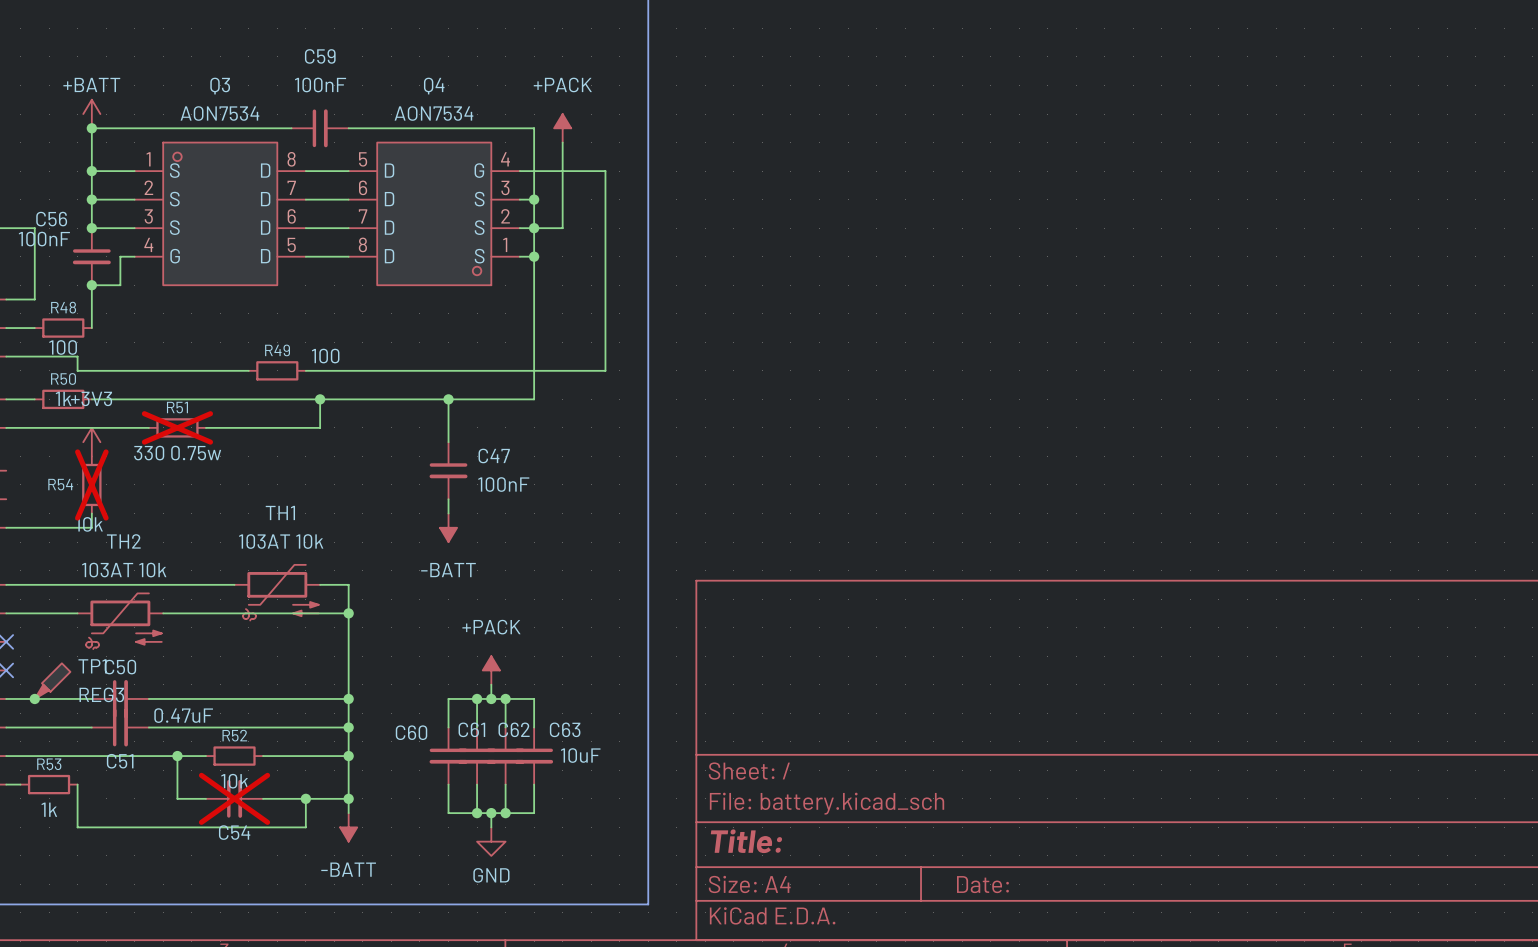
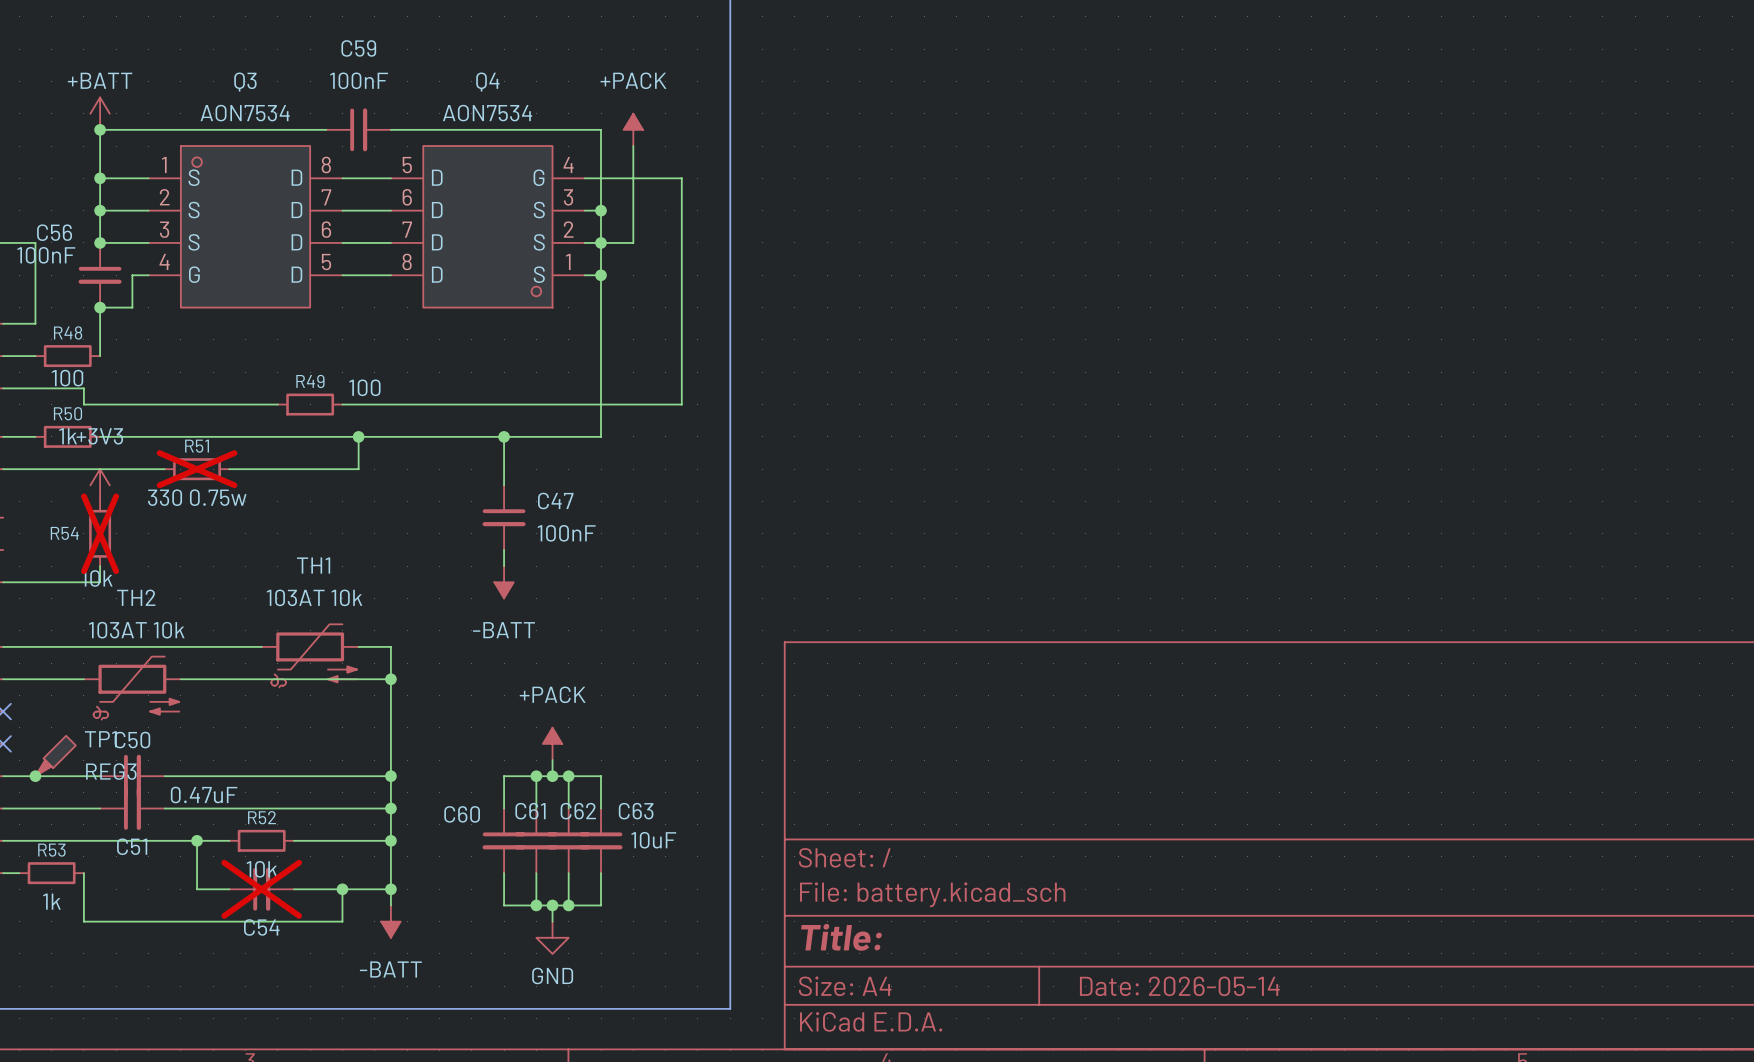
title block: Date: (982, 884) -> Date: 2026-05-14 (1179, 986)

